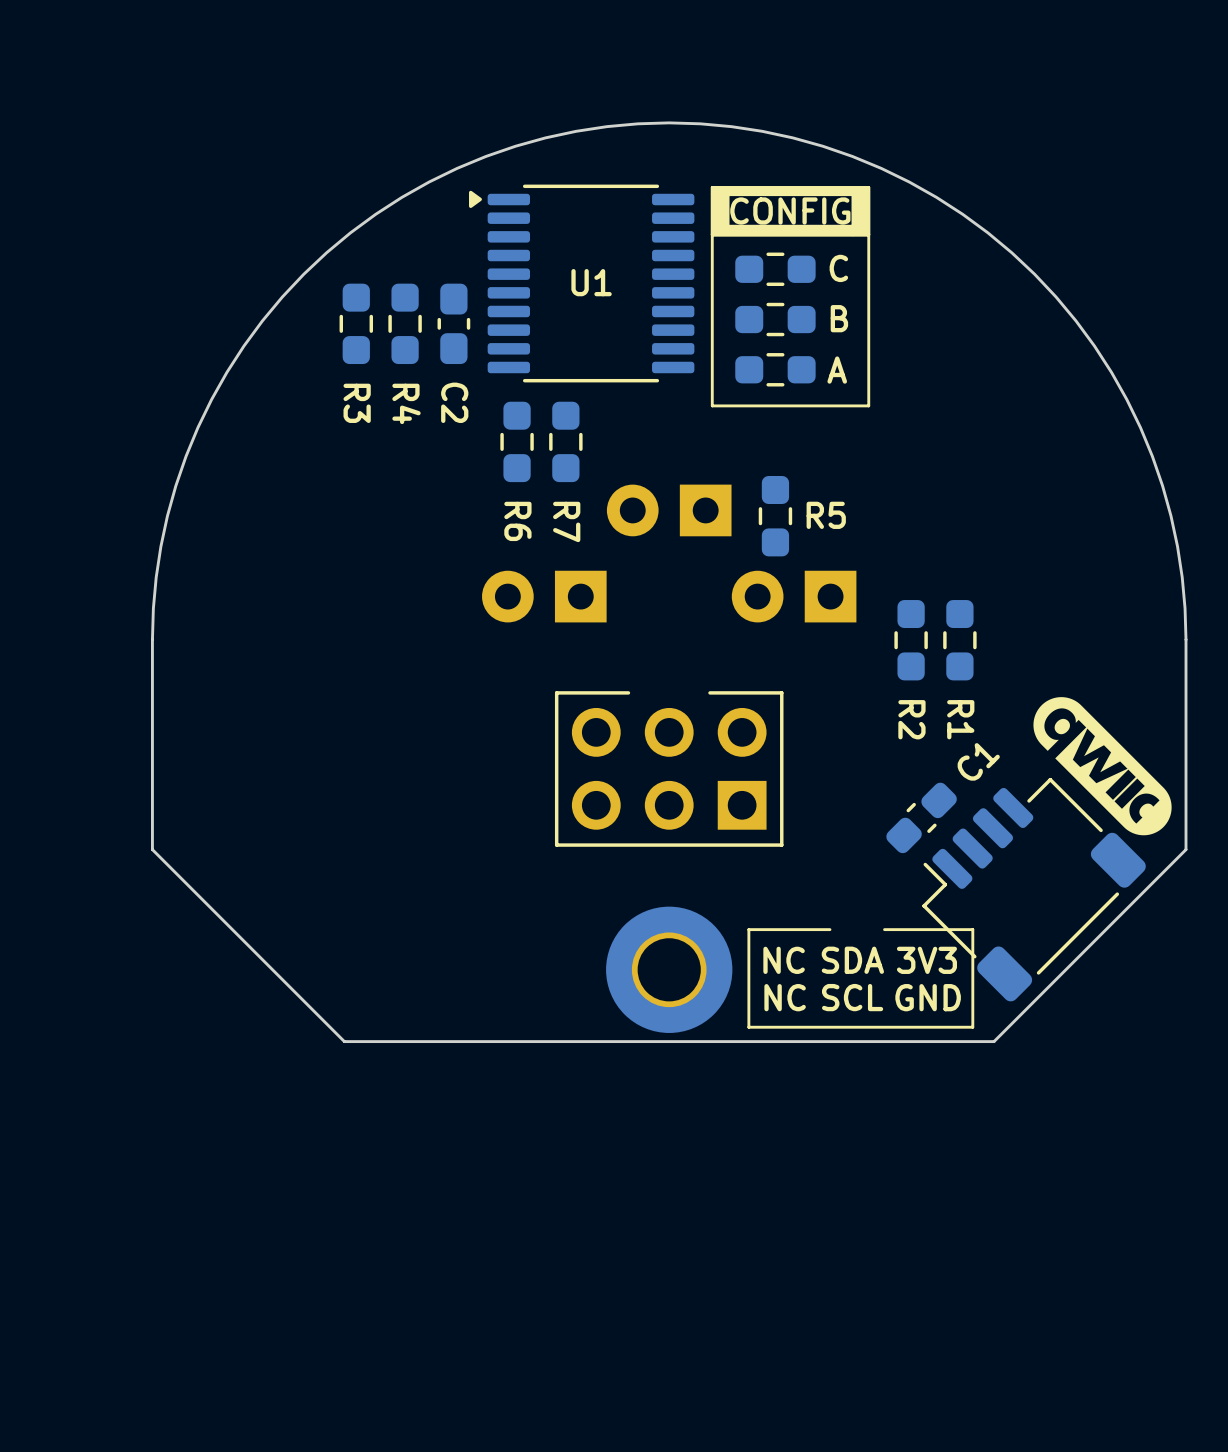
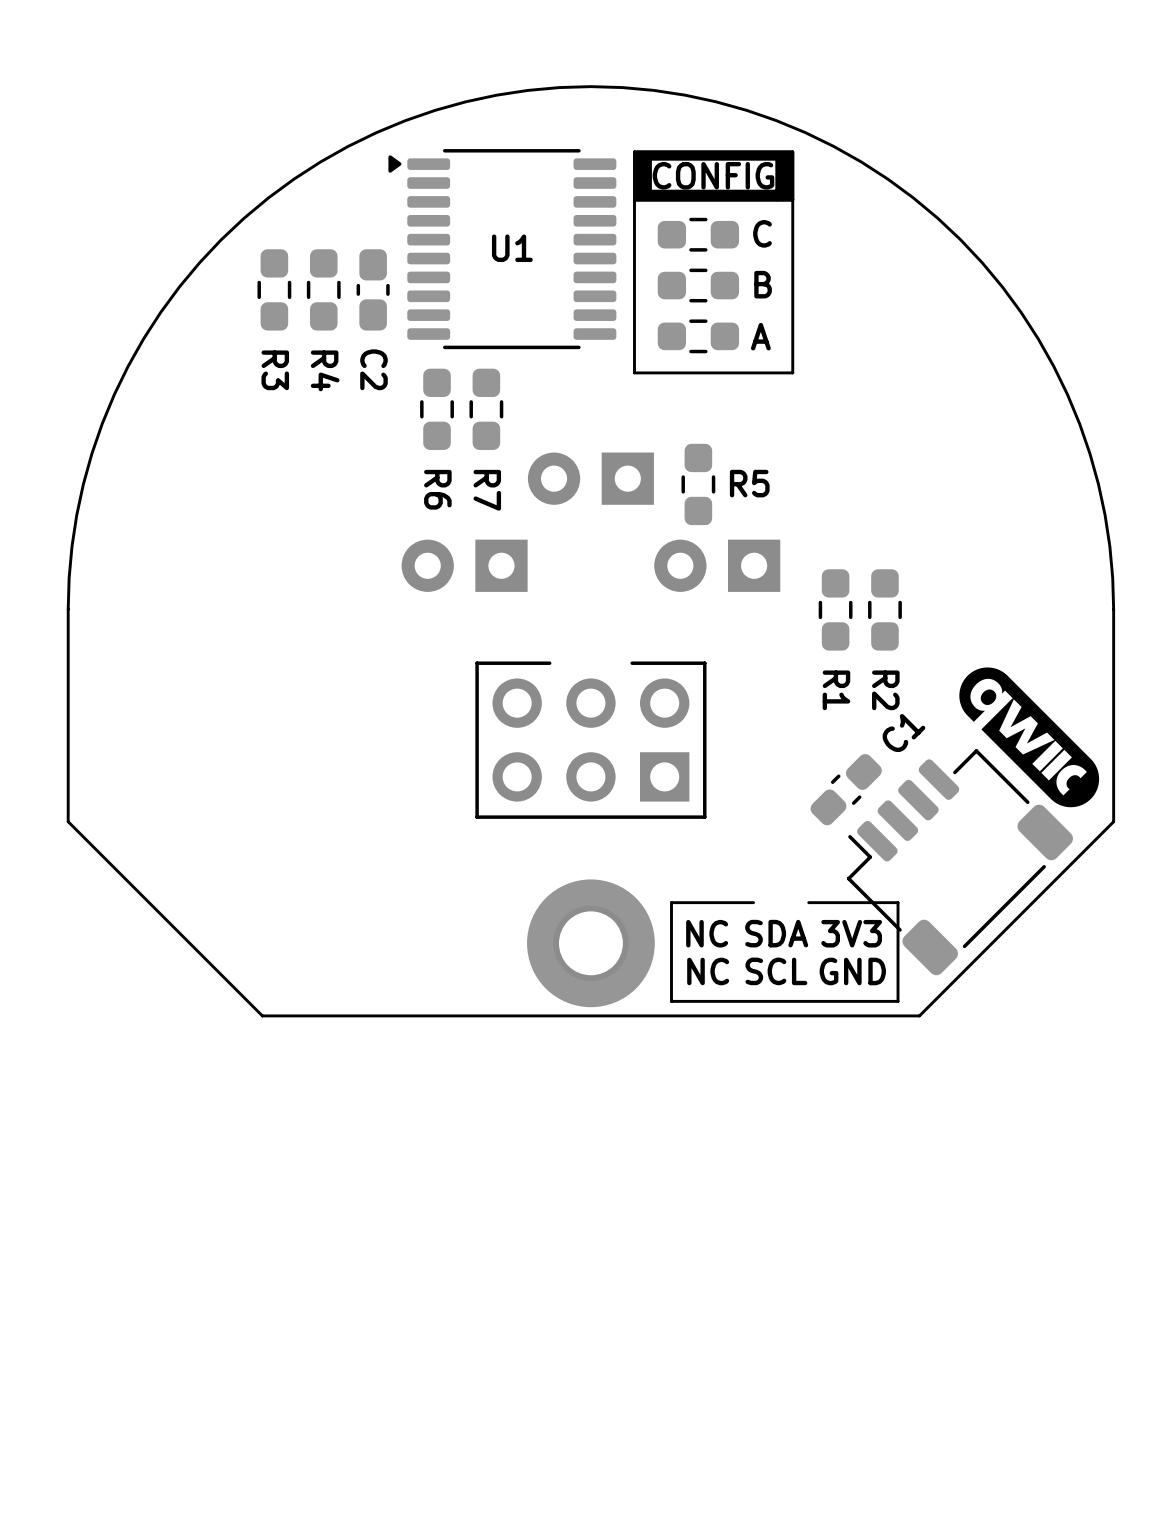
R2 name: R2 (911, 719) -> R1 (836, 690)
R1 name: R1 (960, 719) -> R2 (885, 690)

